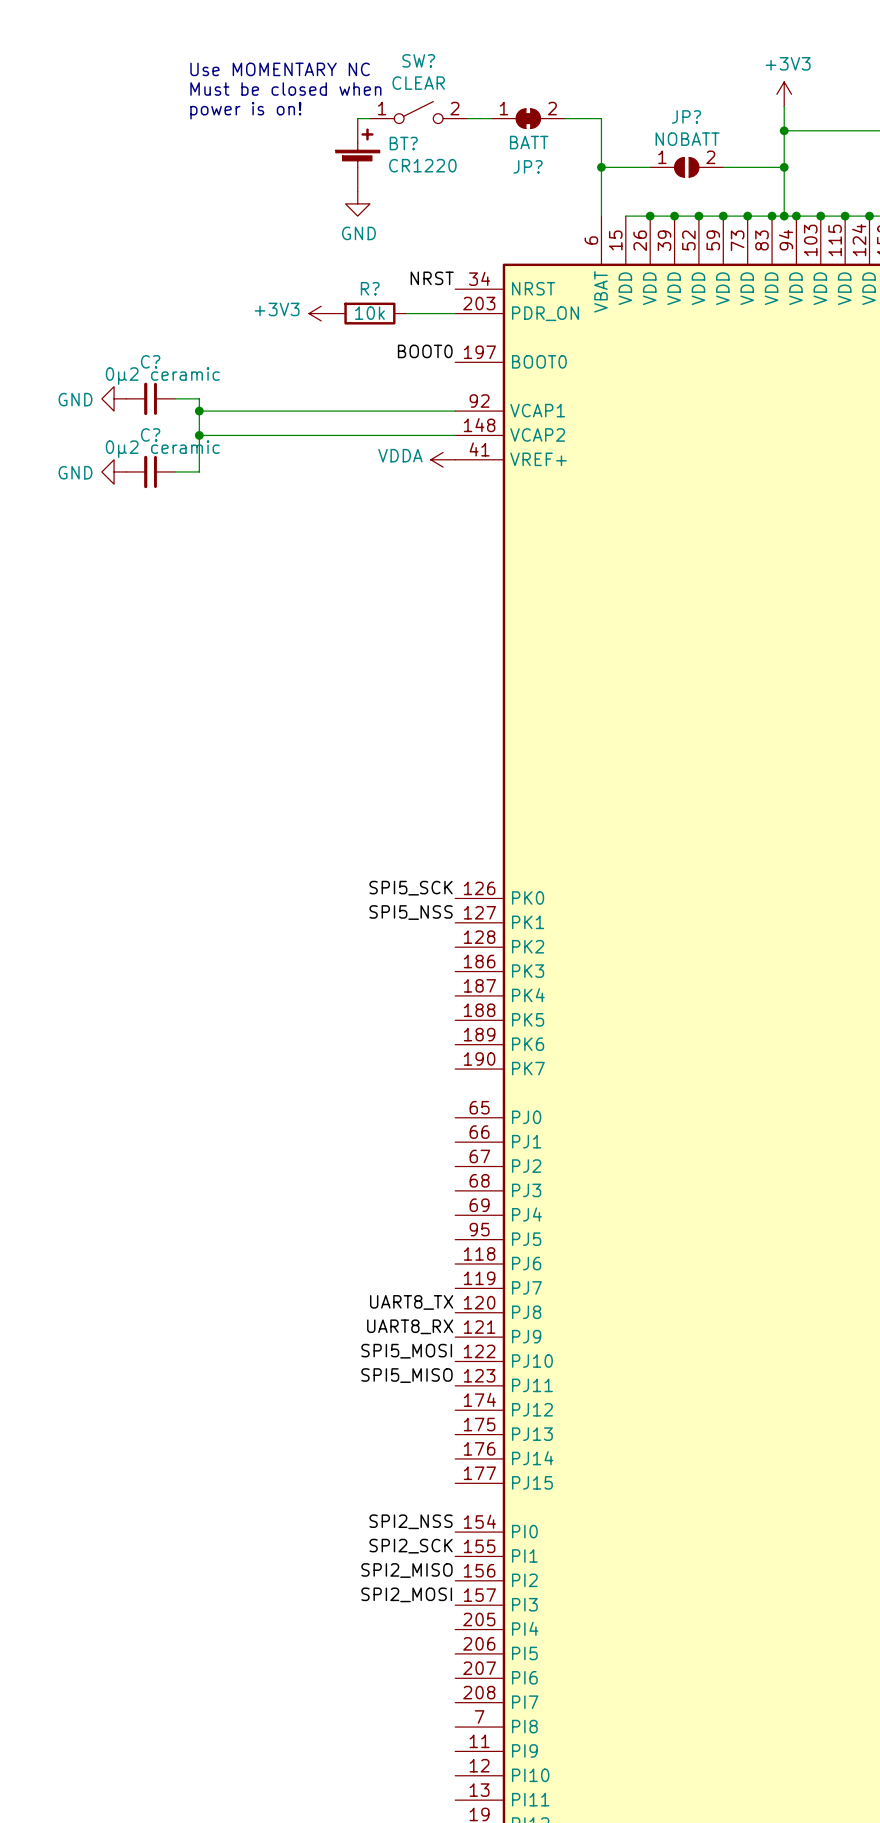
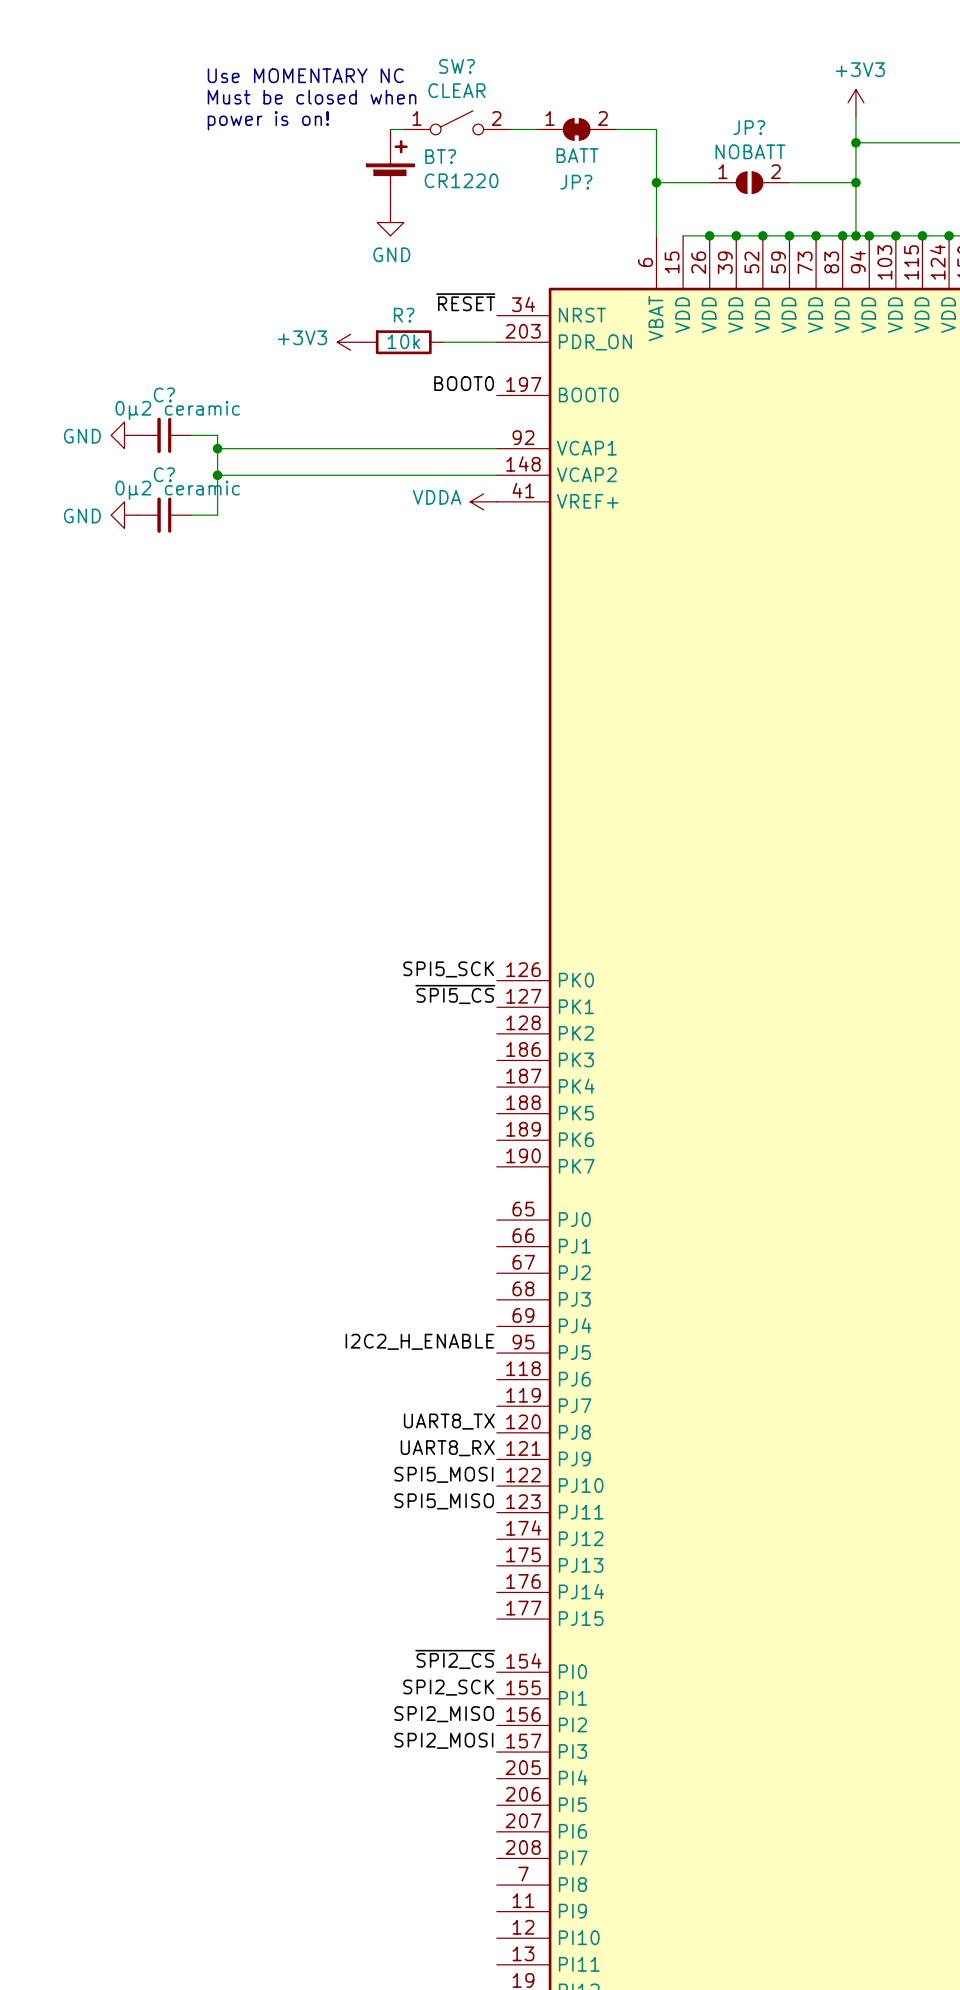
label: NRST (432, 278) -> ~{RESET} (465, 302)
label: SPI5_NSS (411, 912) -> ~{SPI5_CS} (455, 994)
label: none -> I2C2_H_ENABLE (419, 1341)
label: SPI2_NSS (411, 1521) -> ~{SPI2_CS} (455, 1659)

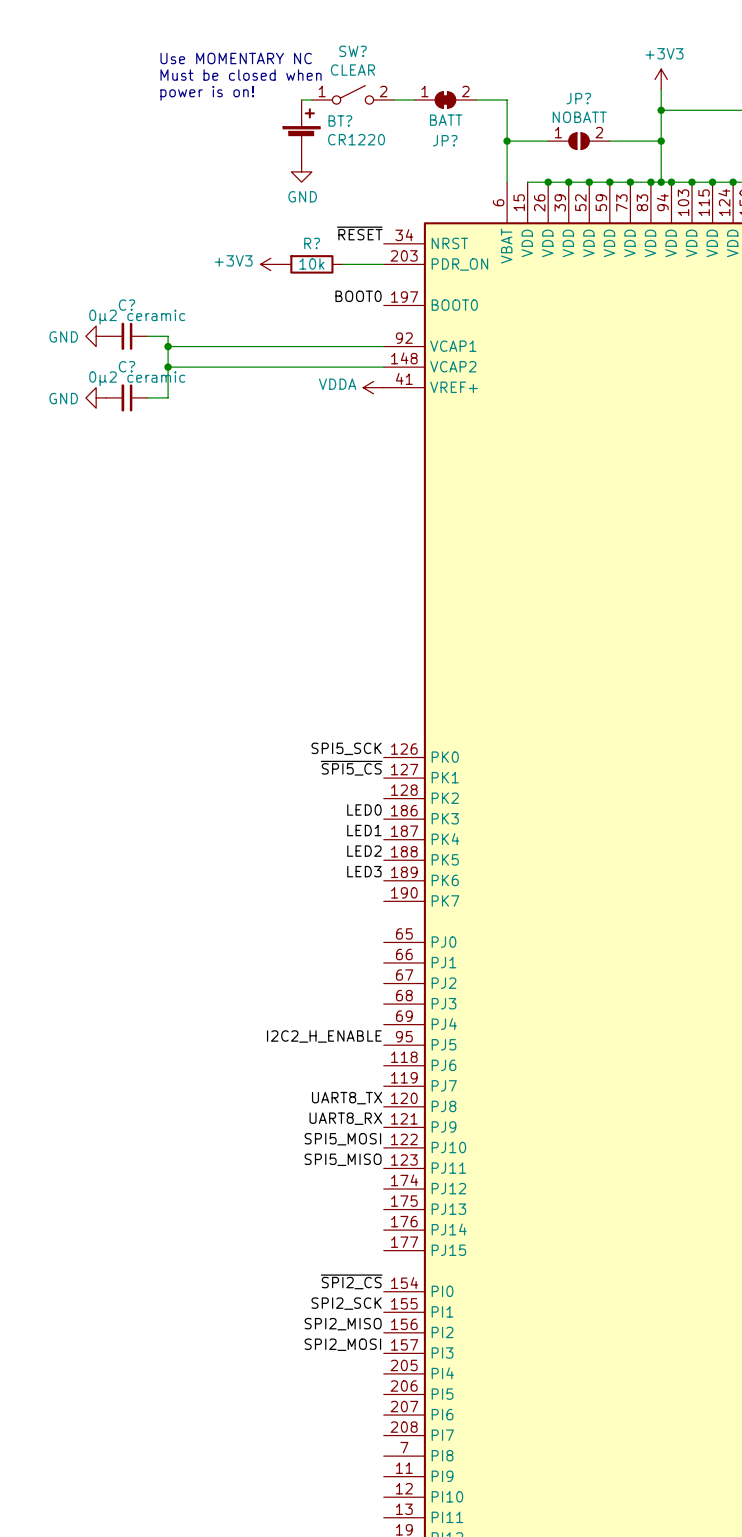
label: none -> LED0 (364, 809)
label: none -> LED1 (364, 830)
label: none -> LED2 (364, 851)
label: none -> LED3 (364, 871)

